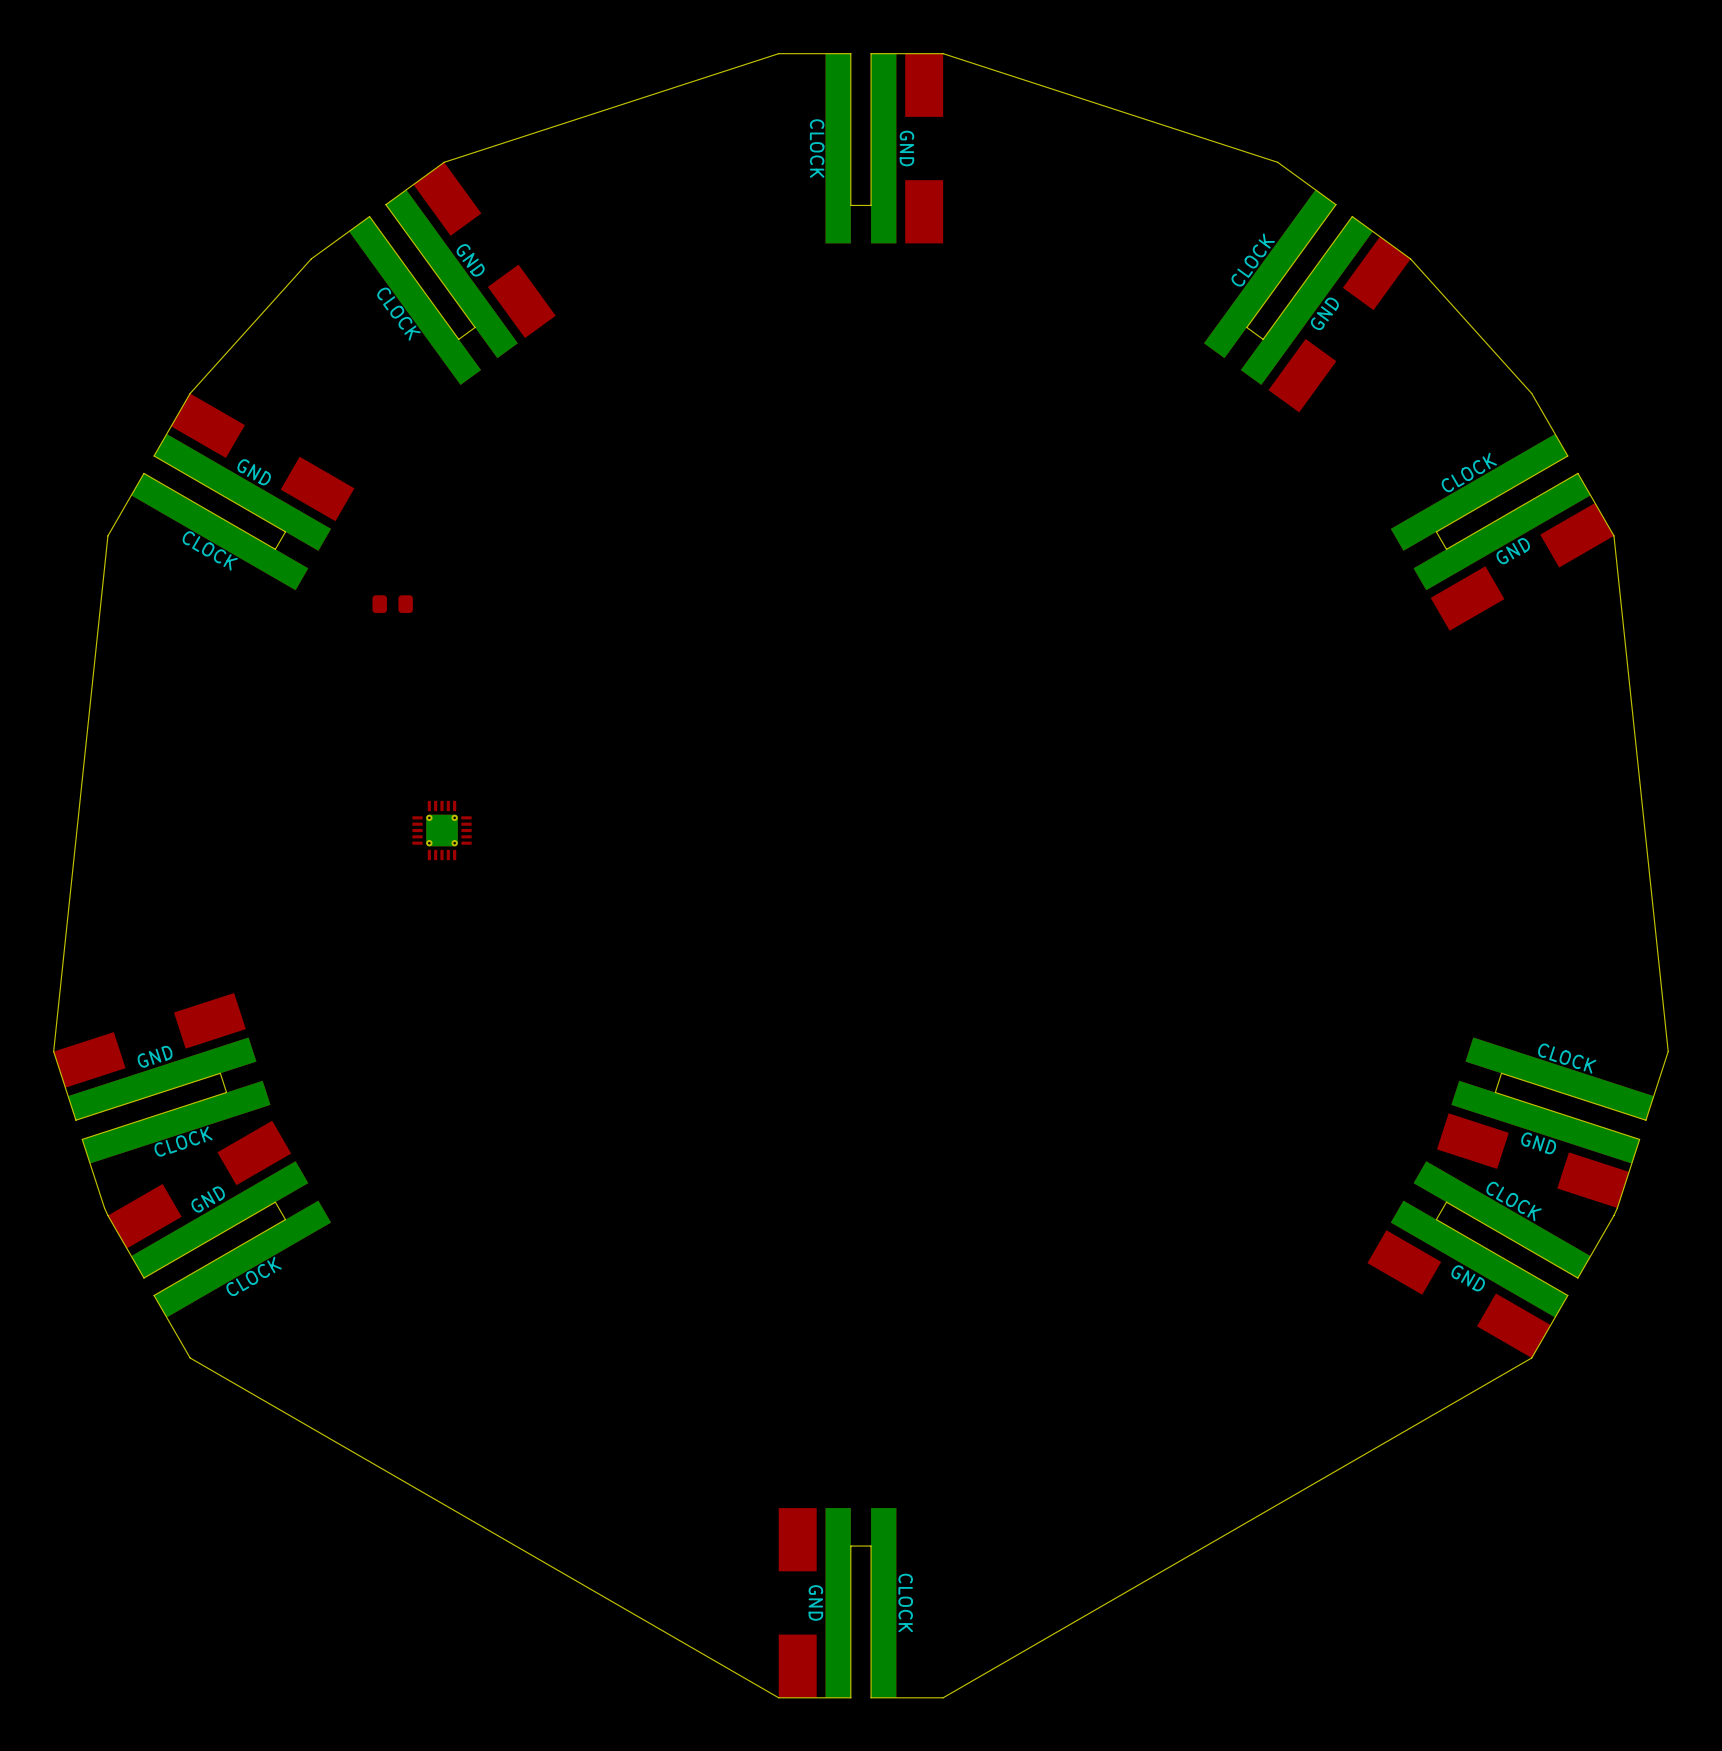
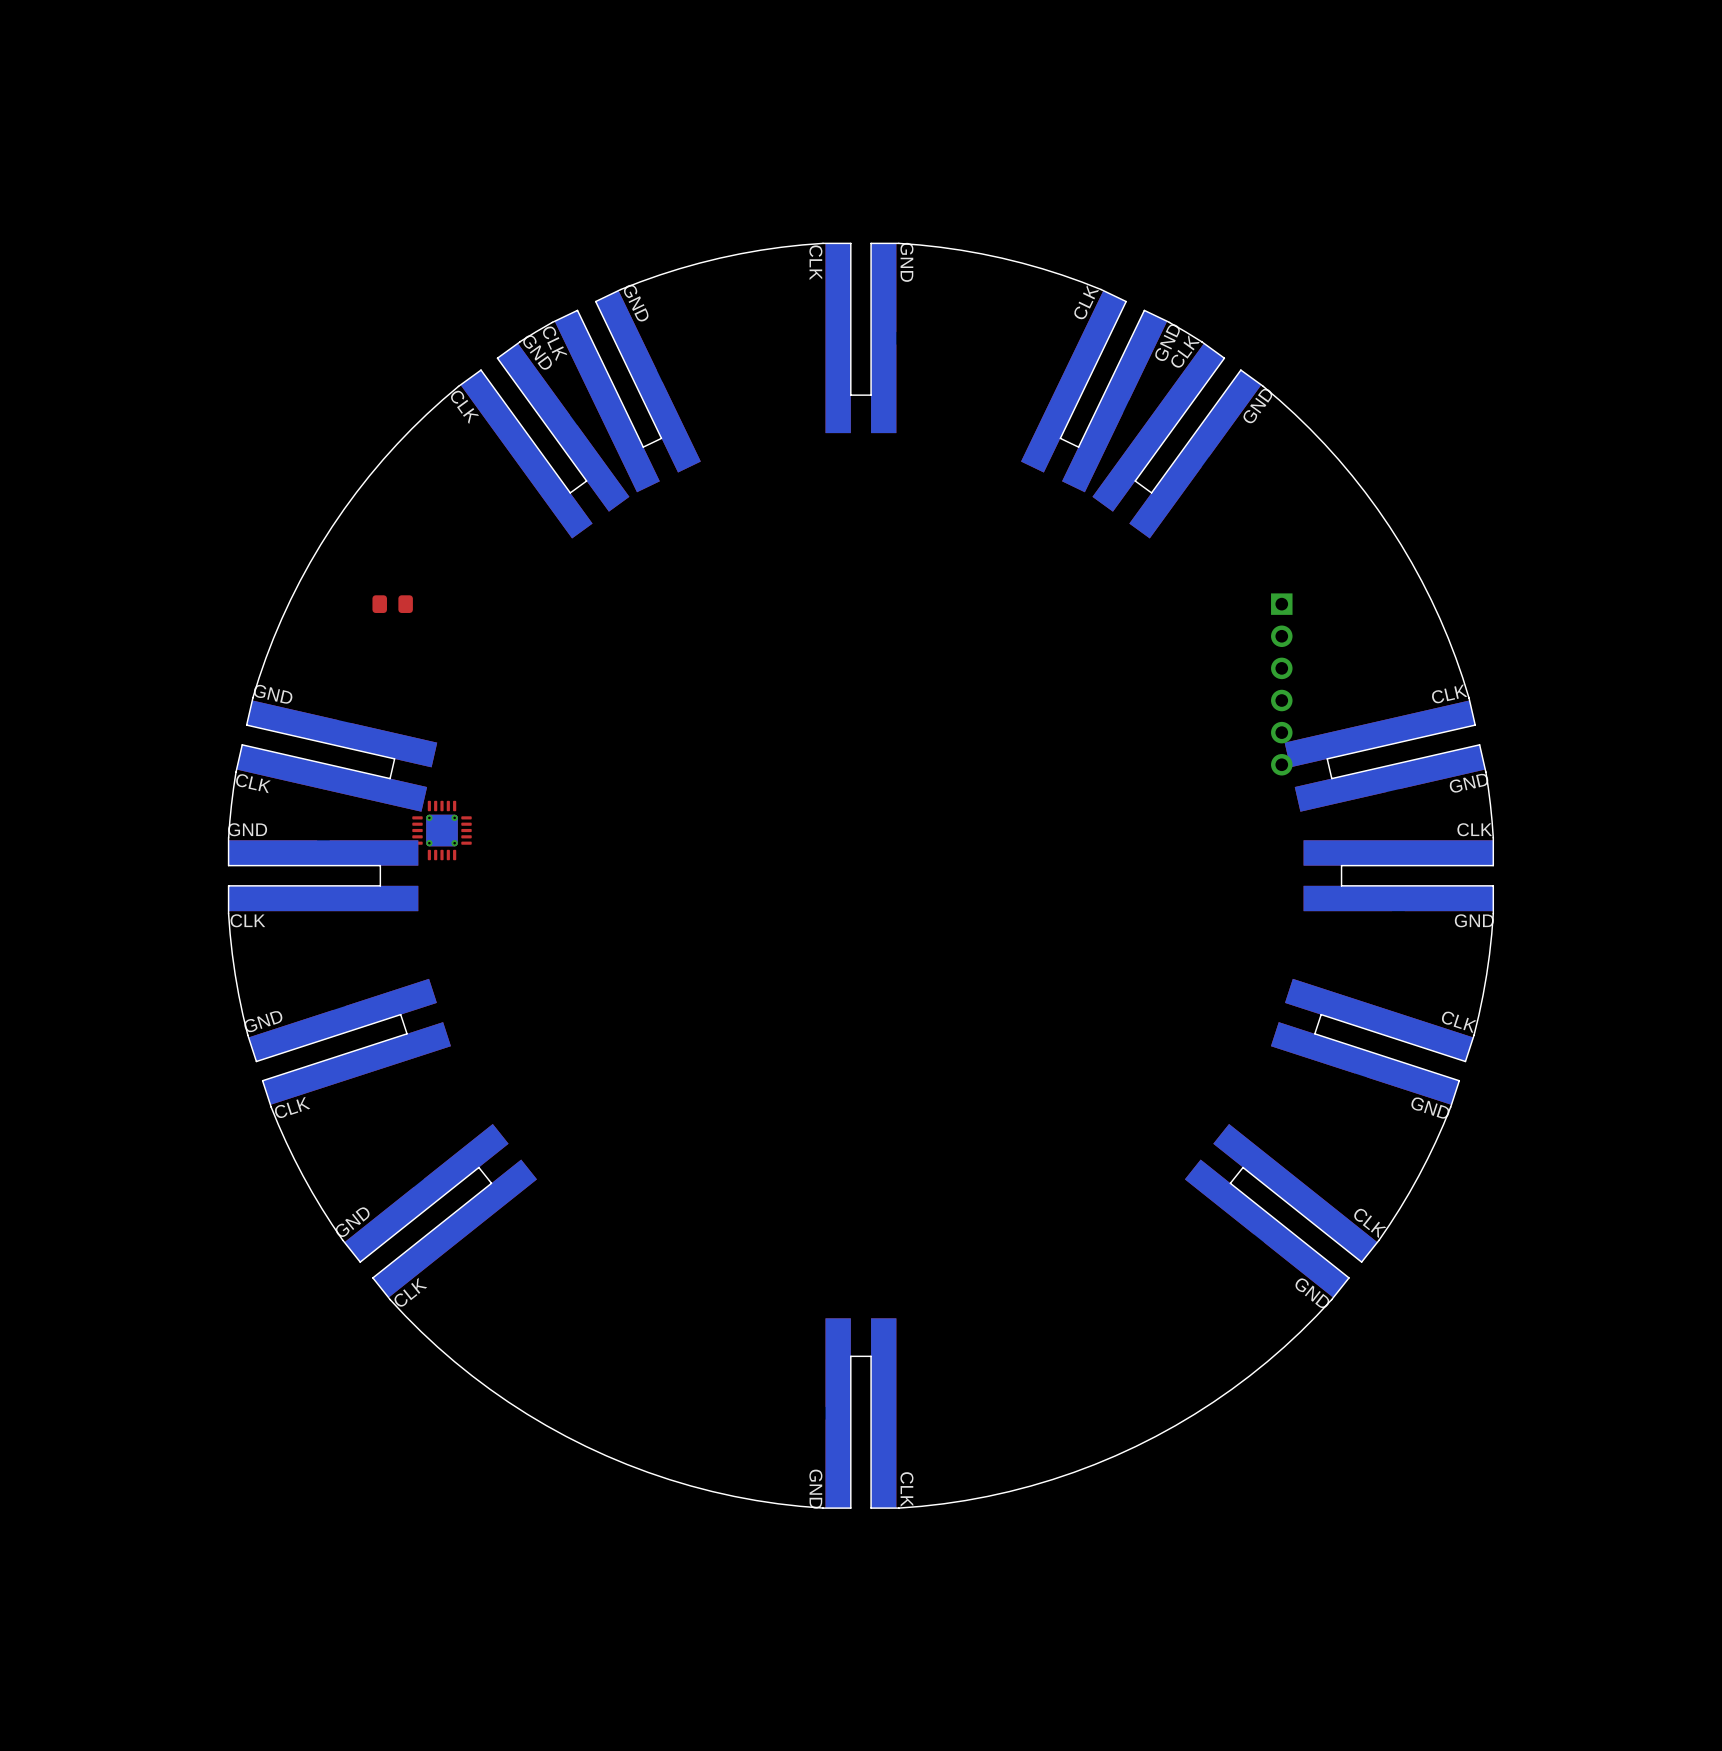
board edge: (943, 53) (871, 53) (871, 205) (850, 205) (850, 53) (778, 53) (444, 162) (385, 204) (475, 327) (458, 339) (369, 216) (311, 258) (190, 393) (154, 455) (285, 531) (275, 549) (143, 473) (107, 535) (53, 1051) (75, 1120) (220, 1073) (226, 1092) (82, 1139) (104, 1207) (143, 1278) (275, 1202) (285, 1219) (154, 1295) (190, 1357) (778, 1697) (850, 1697) (850, 1546) (871, 1546) (871, 1697) (943, 1697) (1531, 1357) (1567, 1295) (1436, 1219) (1446, 1202) (1577, 1278) (1617, 1207) (1639, 1139) (1495, 1092) (1501, 1073) (1645, 1120) (1668, 1051) (1613, 535) (1577, 473) (1446, 549) (1436, 531) (1567, 455) (1531, 393) (1410, 258) (1352, 216) (1263, 339) (1246, 327) (1335, 204) (1277, 162) (943, 53) -> none
part: (884, 148) -> none
part: (452, 273) -> none
part: (1307, 301) -> none
board edge: none -> (1169, 322) (1144, 310) (1078, 447) (1060, 438) (1126, 301) (1101, 289) (1062, 275) (981, 253) (919, 244) (871, 243) (871, 395) (850, 395) (850, 243) (823, 243) (781, 247) (719, 258) (659, 275) (620, 289) (595, 301) (661, 438) (643, 447) (577, 310) (519, 341)
board edge: none -> (1169, 322) (1224, 358) (1135, 481) (1151, 492) (1240, 370) (1263, 386) (1310, 428) (1365, 492) (1411, 562) (1440, 619) (1455, 658) (1469, 698) (1475, 725) (1327, 758) (1331, 778) (1479, 744) (1490, 804) (1493, 865) (1341, 865) (1341, 885) (1493, 885) (1493, 913) (1486, 974) (1474, 1035) (1465, 1061) (1321, 1014) (1314, 1033) (1459, 1080) (1450, 1107)
part: none -> (860, 338)
board edge: none -> (519, 341) (497, 358) (586, 481) (570, 492) (481, 370) (458, 386) (411, 428) (356, 492) (310, 562) (273, 638) (252, 698) (246, 725) (394, 758) (390, 778) (242, 744) (233, 788) (228, 837) (228, 865) (380, 865) (380, 885) (228, 885) (228, 913) (235, 974) (247, 1035) (256, 1061) (400, 1014) (407, 1033) (262, 1080) (278, 1124) (303, 1175) (332, 1224) (360, 1262) (478, 1167) (491, 1183) (372, 1277) (405, 1316) (454, 1361) (490, 1389) (546, 1425) (586, 1446) (648, 1472) (712, 1491) (756, 1500) (800, 1506) (850, 1508) (850, 1356) (871, 1356) (871, 1508) (898, 1508) (943, 1503) (1009, 1491) (1052, 1479) (1094, 1464) (1155, 1436) (1194, 1414) (1231, 1389) (1284, 1347) (1316, 1316) (1349, 1277) (1230, 1183) (1243, 1167) (1361, 1262) (1378, 1240) (1409, 1192) (1427, 1159) (1450, 1107)
part: none -> (627, 391)
part: none -> (1094, 391)
part: none -> (544, 440)
part: none -> (1176, 440)
part: (242, 491) -> none
part: (1502, 532) -> none
part: none -> (1281, 684)
part: none -> (336, 756)
part: none -> (1385, 756)
part: none -> (323, 875)
part: none -> (1398, 875)
part: none -> (349, 1041)
part: none -> (1372, 1041)
part: (162, 1078) -> none
part: (1545, 1122) -> none
part: none -> (440, 1210)
part: none -> (1281, 1210)
part: (219, 1219) -> none
part: (1479, 1259) -> none
part: none -> (860, 1413)
part: (837, 1602) -> none

